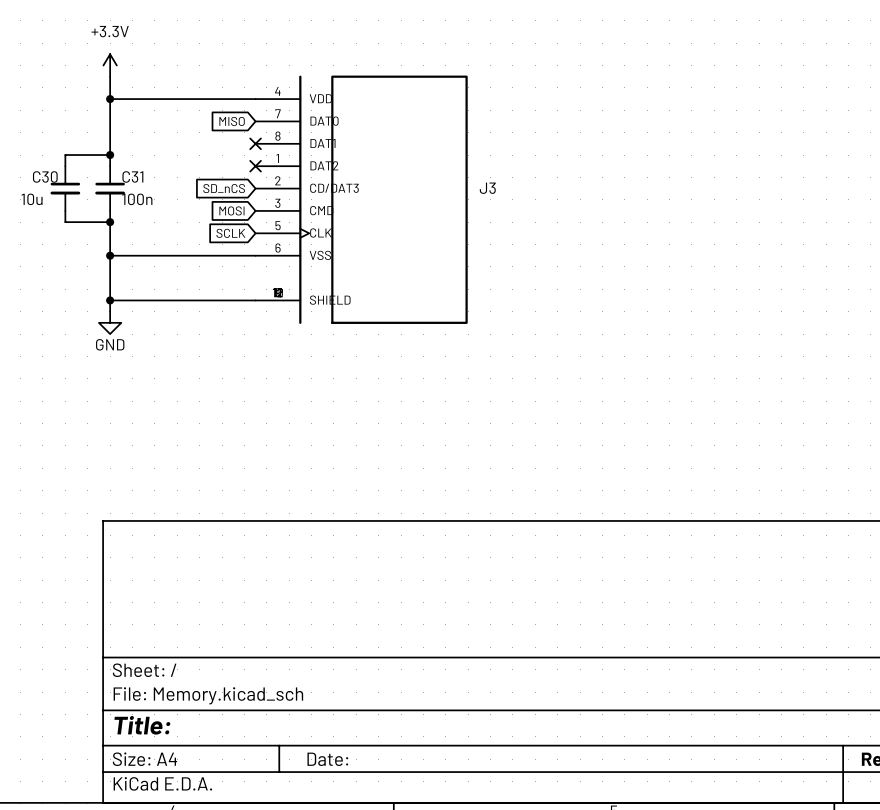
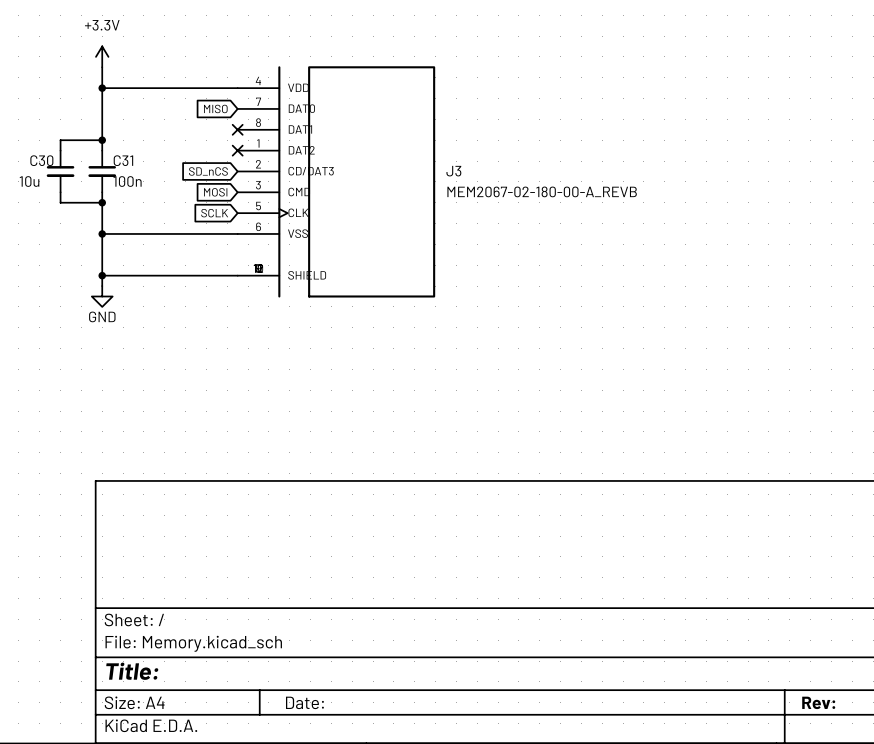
J3 value: none -> MEM2067-02-180-00-A_REVB (542, 191)

